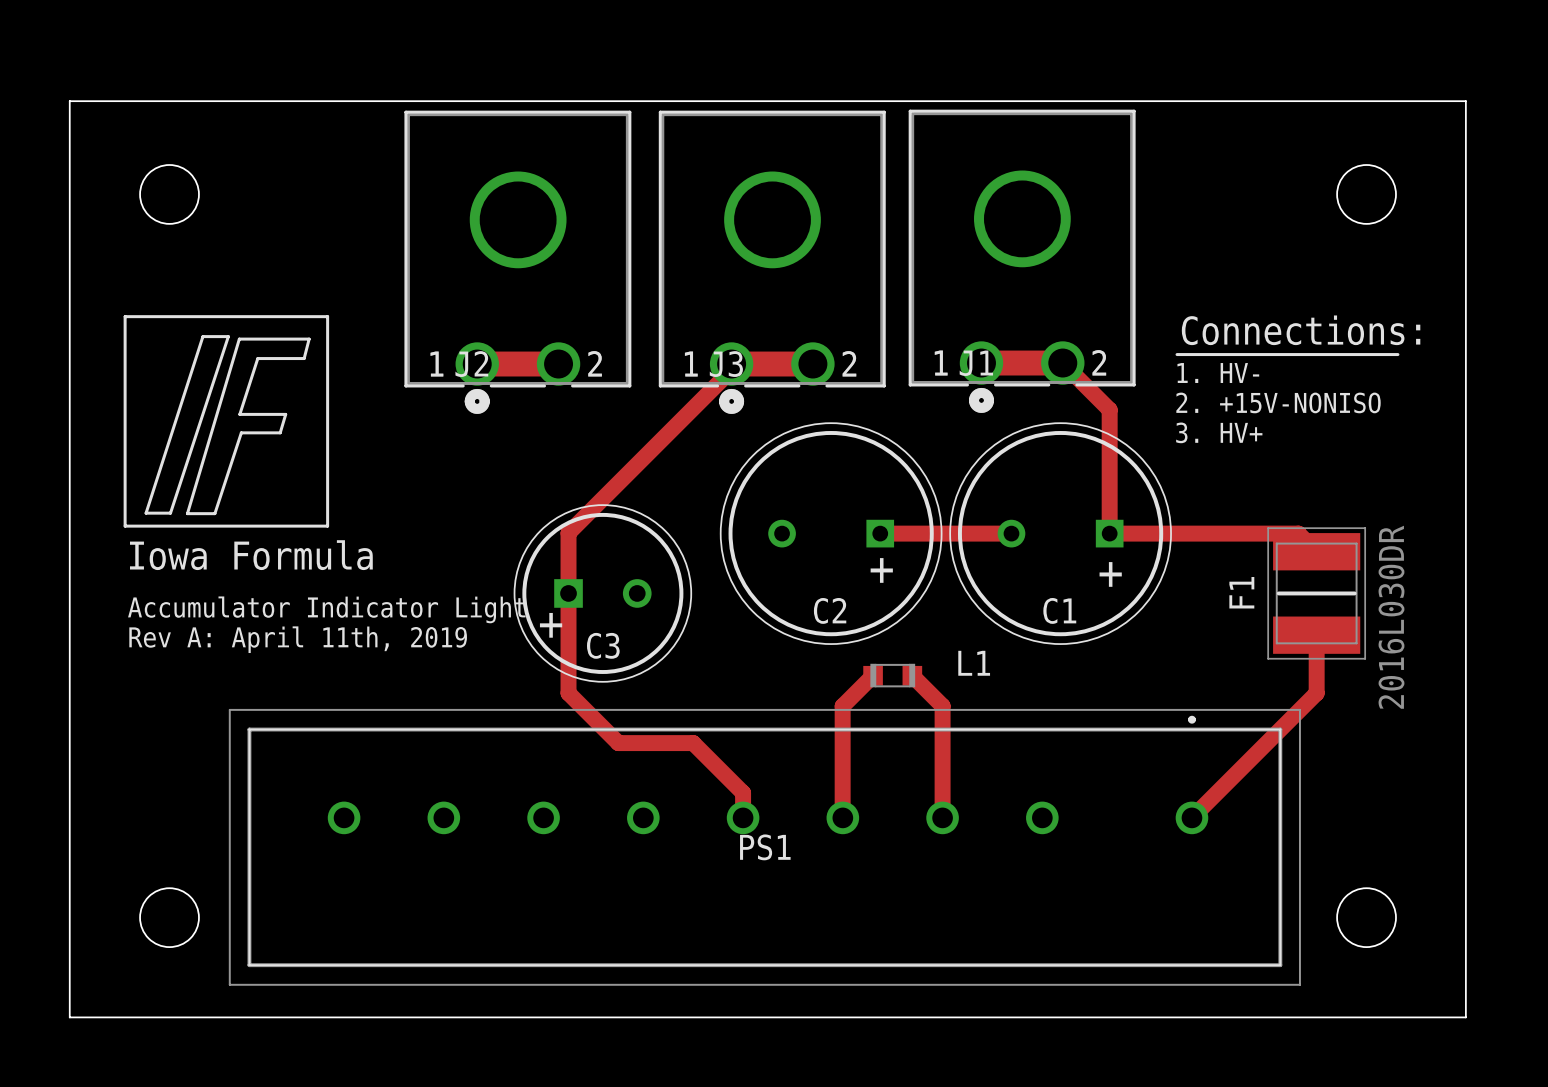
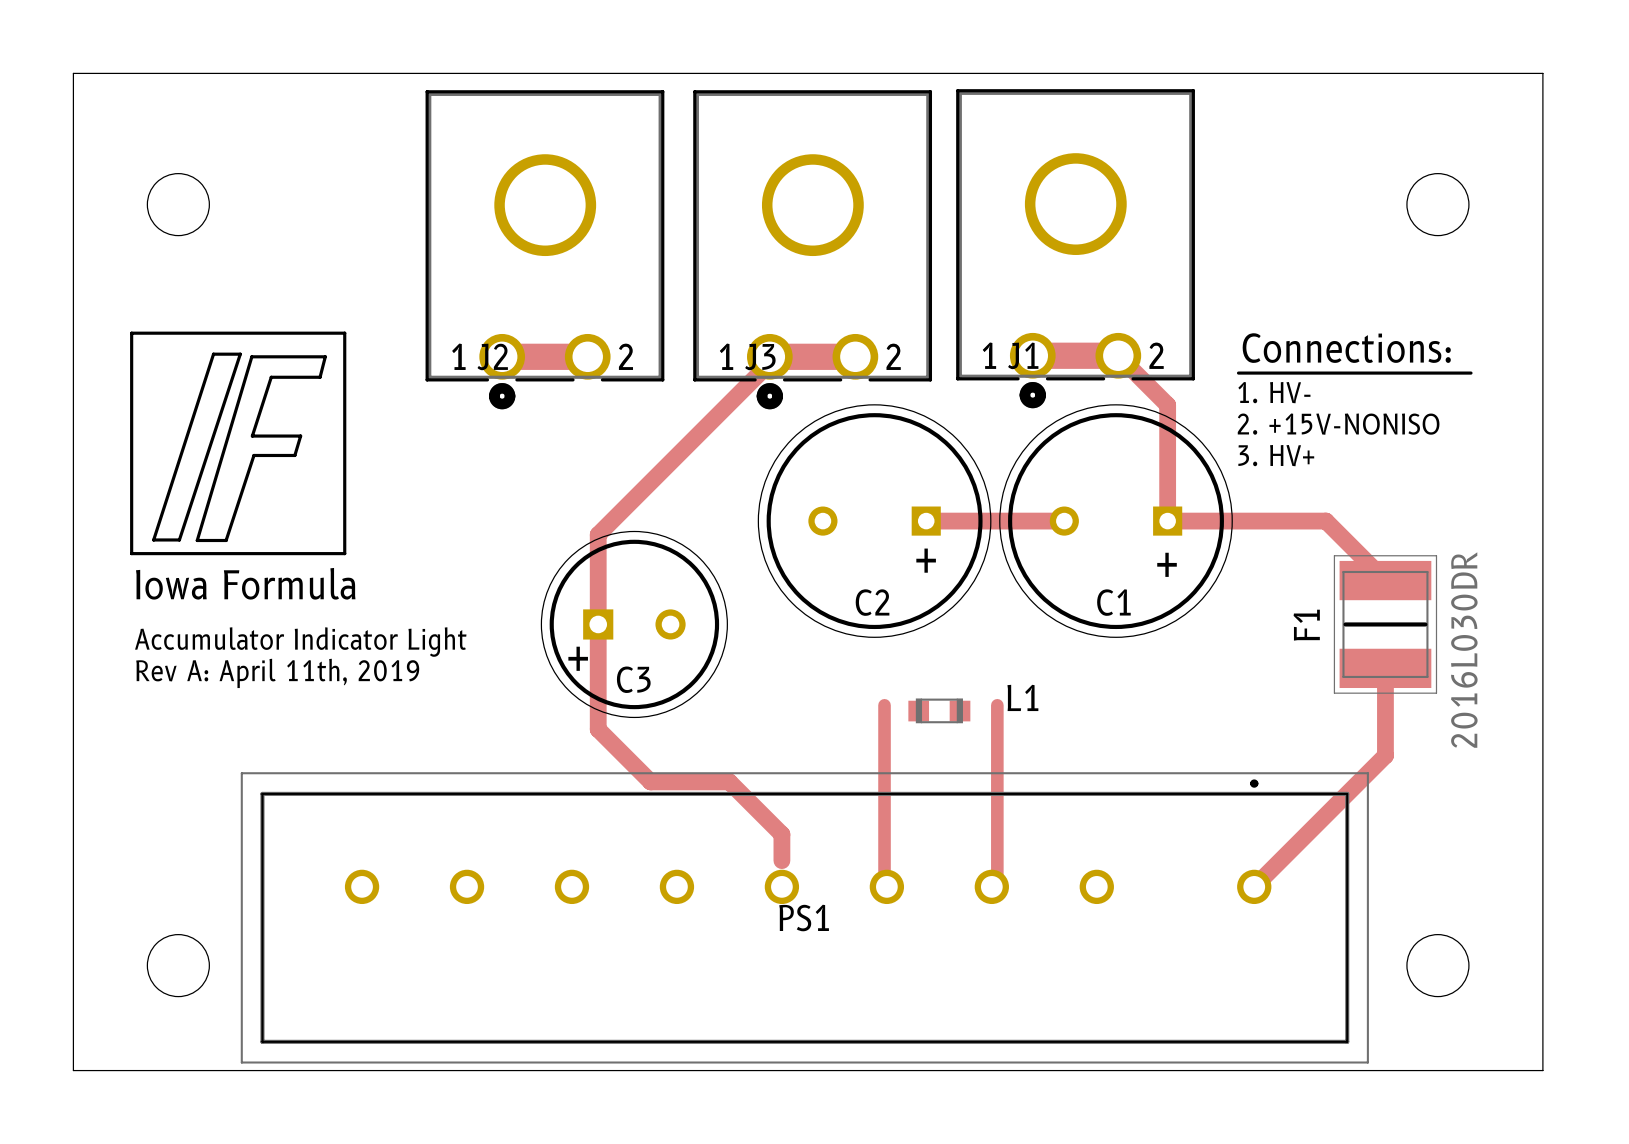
board edge: (69, 101) (1465, 101) (1465, 1017) -> (73, 106) (73, 73) (1542, 73) (1542, 1070)
J1 position: (1022, 261) -> (1075, 248)
J2 position: (517, 262) -> (544, 249)
J3 position: (772, 262) -> (812, 249)
track: (981, 363) (1062, 363) (1109, 409) -> (1032, 355) (1118, 355) (1167, 405) (1167, 431)
track: (477, 364) (558, 364) -> (502, 356) (587, 356)
track: (812, 364) (731, 364) (731, 370) (568, 533) -> (855, 356) (769, 356) (769, 363) (598, 534) (598, 560)
track: (1109, 495) (1109, 533) (1298, 533) -> (1167, 521) (1325, 521) (1366, 561)
C2 position: (831, 533) -> (874, 521)
track: (880, 533) (1011, 533) -> (926, 521) (1064, 521)
C1 position: (1060, 533) -> (1116, 521)
text position: + (881, 570) -> + (926, 560)
text position: + (1110, 574) -> + (1167, 564)
track: none -> (884, 705) (884, 884) (886, 886)
track: none -> (997, 705) (997, 881) (991, 886)
track: (873, 675) (842, 706) (842, 817) -> none
track: (912, 675) (942, 705) (942, 817) -> none
track: (1316, 693) (1191, 817) -> (1385, 729) (1385, 755) (1254, 886)
PS1 position: (764, 847) -> (804, 917)

